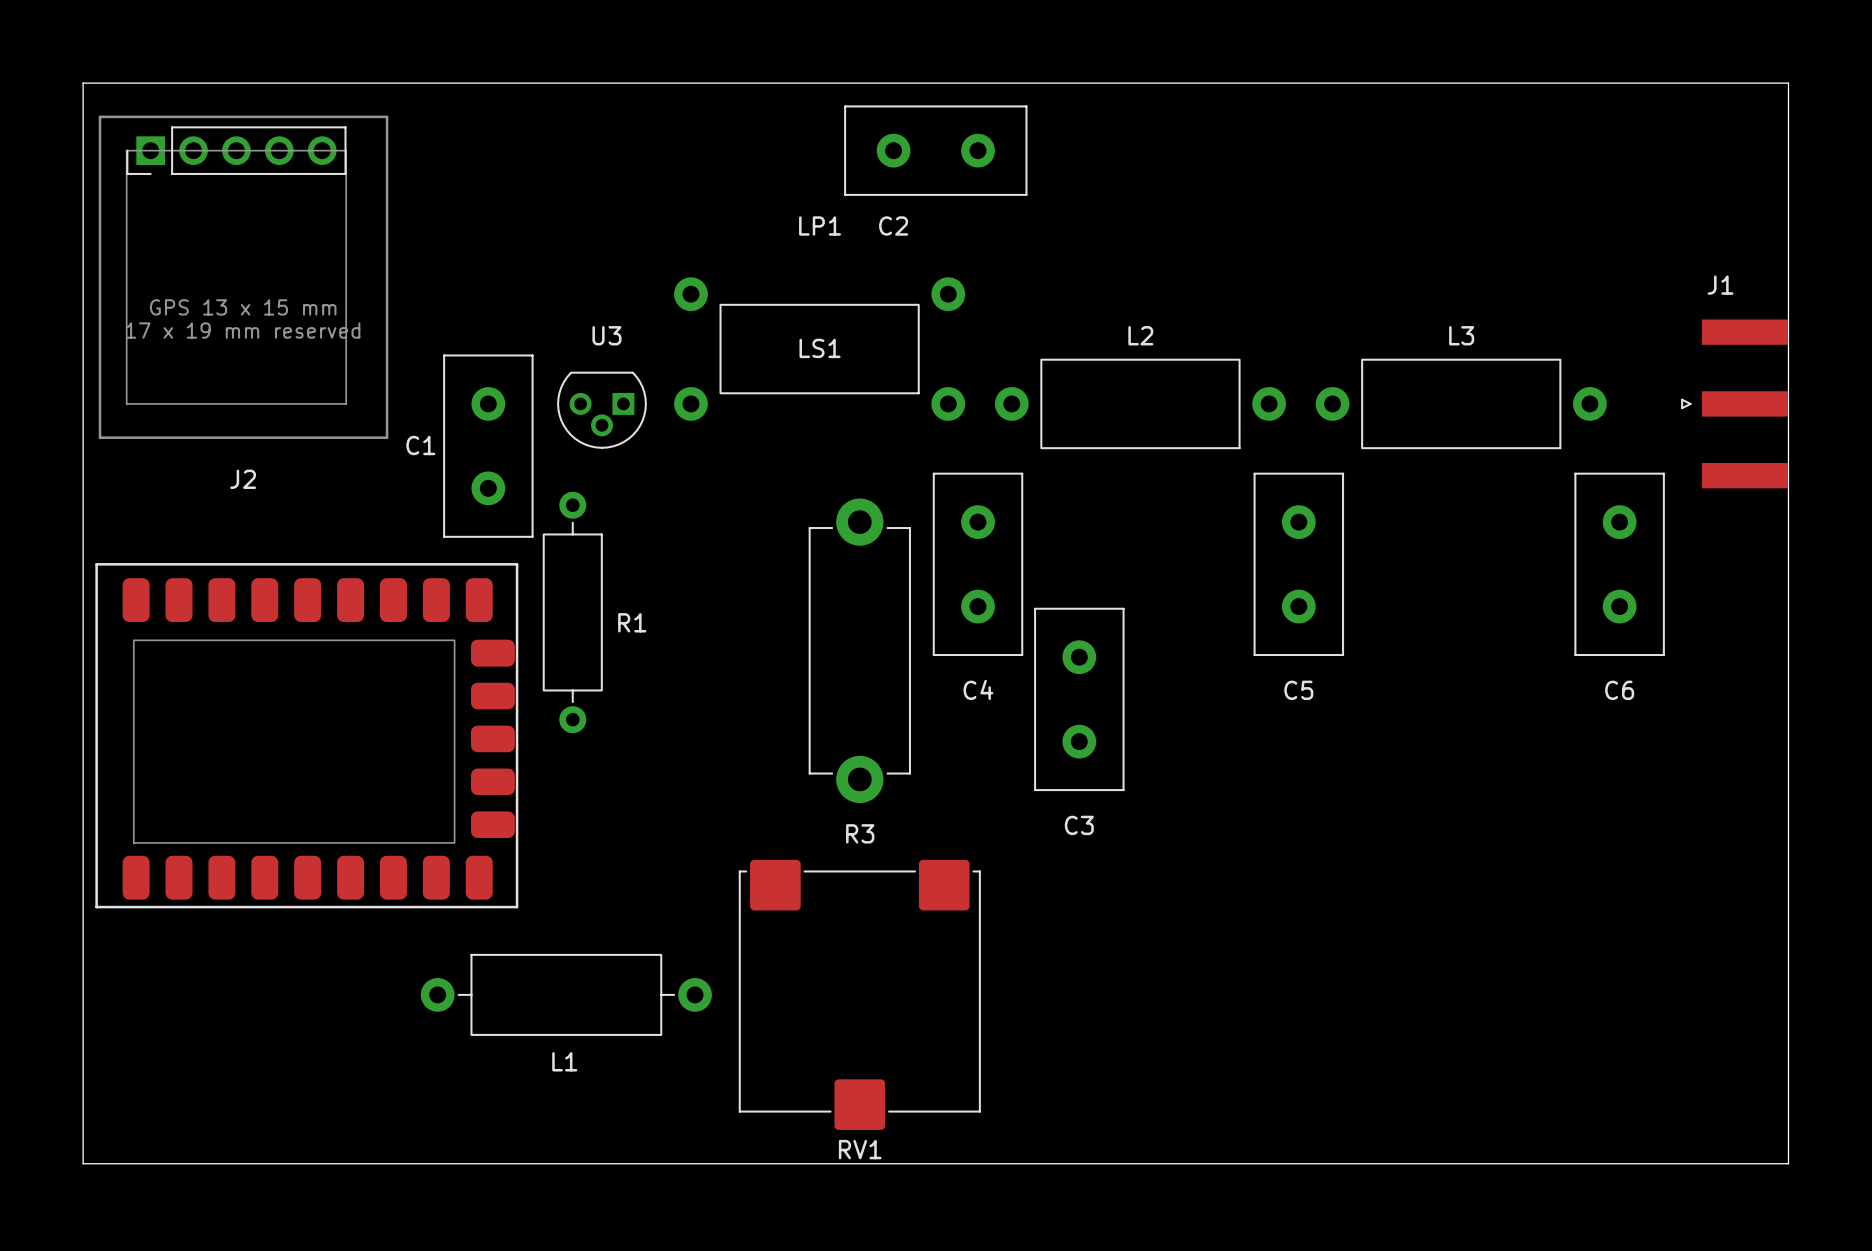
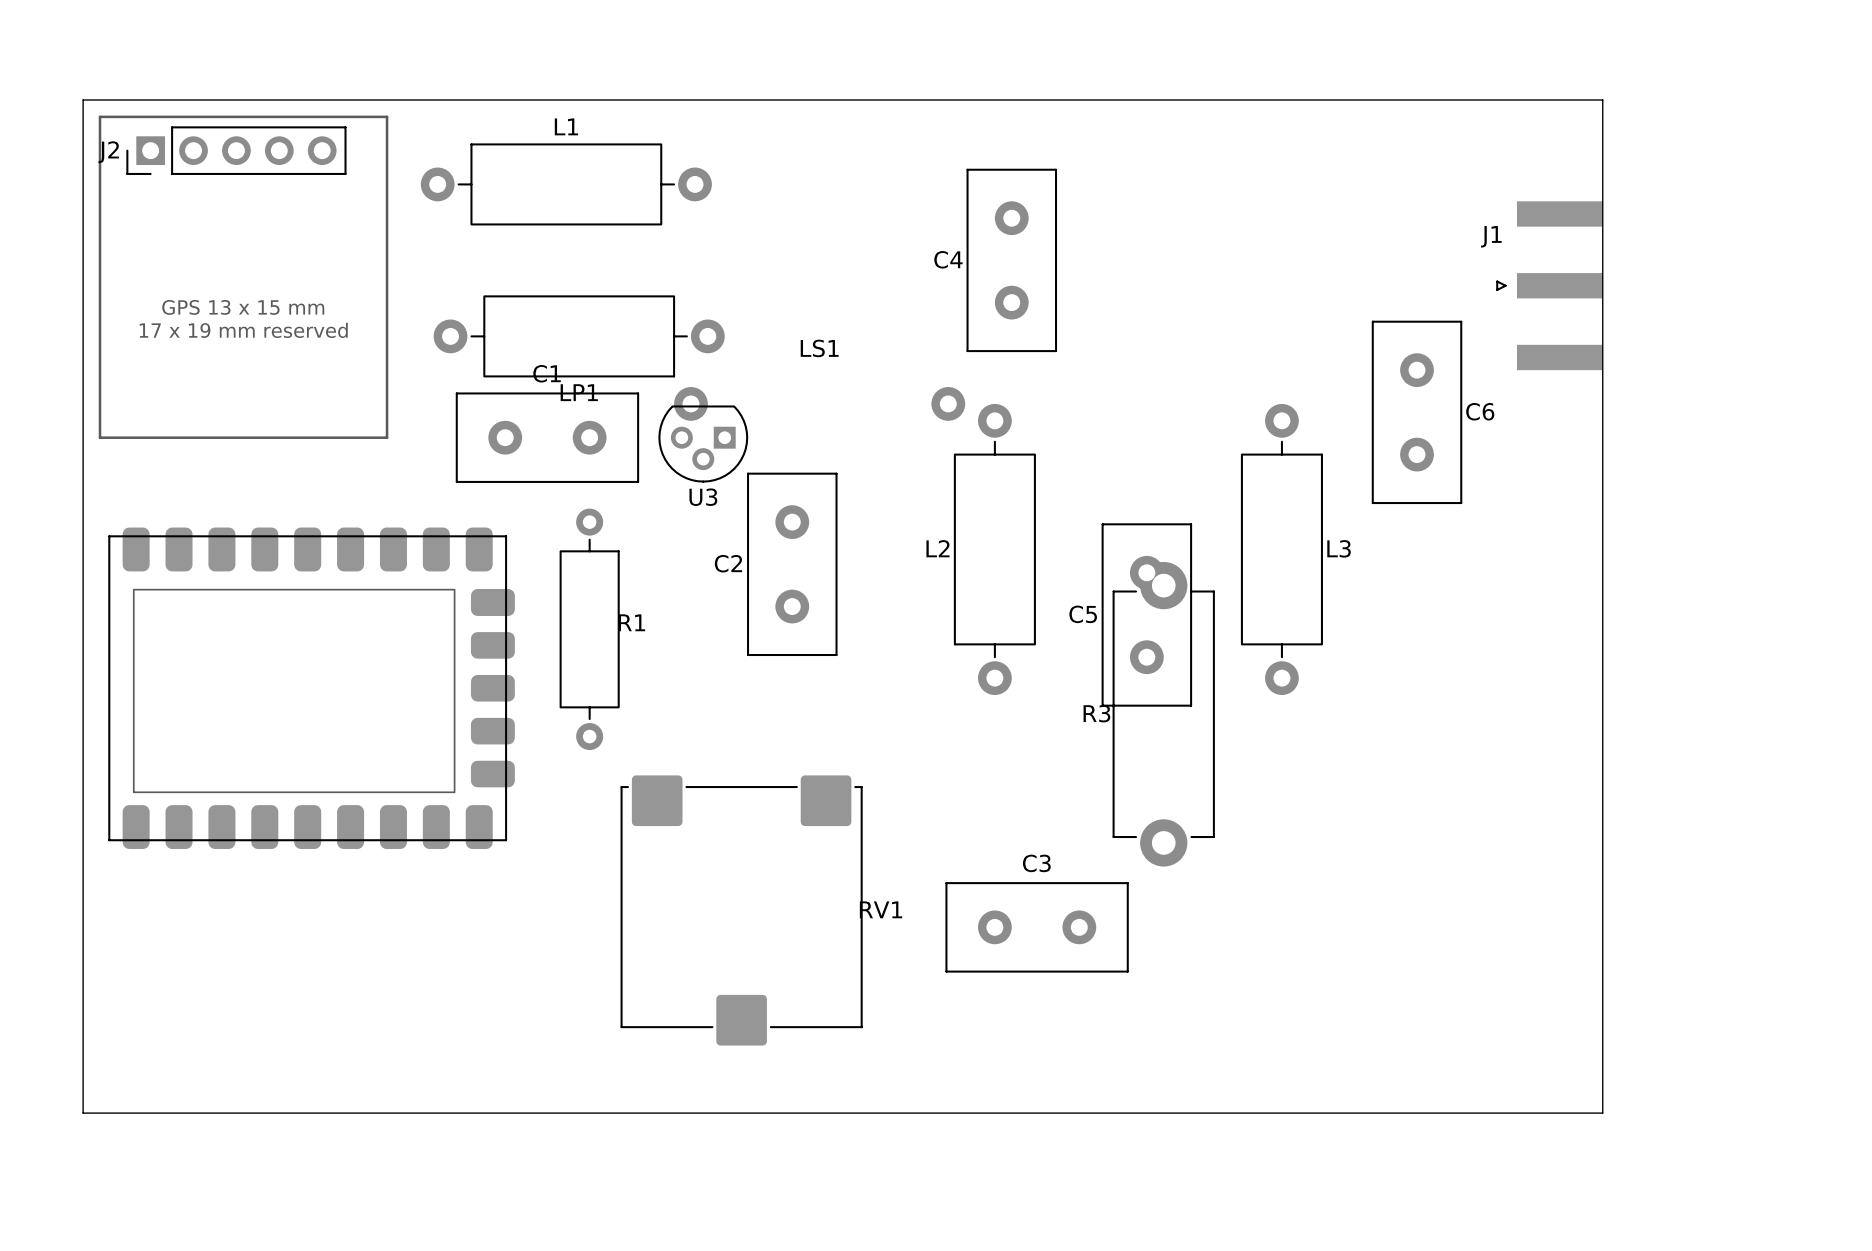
board edge: (83, 100) (83, 83) (1788, 83) (1788, 1163) (83, 1163) (83, 1113) -> (83, 100) (1602, 100) (1602, 1113) (83, 1113)
line: (126, 150) (346, 150) (346, 403) (126, 403) (126, 150) -> none
C2 rotation: 0° (935, 150) -> 90° clockwise (792, 564)
C2 position: (935, 150) -> (792, 564)
LP1 name position: LP1 (820, 226) -> LP1 (579, 392)
C2 name position: C2 (893, 226) -> C2 (728, 563)
LP1 footprint: [674, 277, 966, 395] -> [433, 295, 725, 378]
J1 name position: J1 (1720, 285) -> J1 (1491, 236)
U3 name position: U3 (606, 335) -> U3 (703, 497)
L2 name position: L2 (1140, 335) -> L2 (937, 548)
L3 name position: L3 (1461, 335) -> L3 (1339, 548)
L2 footprint: [994, 358, 1286, 450] -> [953, 403, 1036, 696]
L3 footprint: [1315, 358, 1607, 450] -> [1240, 403, 1323, 696]
J1 position: (1734, 403) -> (1549, 285)
U3 position: (601, 410) -> (703, 444)
C1 rotation: 0° (488, 446) -> 90° clockwise (547, 437)
J2 name position: J2 (243, 479) -> J2 (108, 152)
line: (96, 564) (517, 564) (517, 907) (96, 907) (96, 564) -> none
C4 position: (978, 564) -> (1011, 260)
C5 position: (1298, 564) -> (1146, 614)
C6 position: (1619, 564) -> (1417, 412)
R1 position: (572, 612) -> (589, 629)
R3 position: (859, 650) -> (1163, 714)
part: none -> (311, 688)
C4 name position: C4 (978, 689) -> C4 (948, 259)
C5 name position: C5 (1298, 690) -> C5 (1083, 614)
C6 name position: C6 (1619, 690) -> C6 (1480, 411)
C3 rotation: 0° (1079, 699) -> 90° clockwise (1037, 927)
C3 position: (1079, 699) -> (1037, 927)
part: (318, 738) -> none
C3 name position: C3 (1079, 825) -> C3 (1036, 863)
R3 name position: R3 (860, 833) -> R3 (1096, 713)
L1 position: (566, 994) -> (566, 184)
RV1 position: (859, 994) -> (741, 910)
L1 name position: L1 (564, 1061) -> L1 (566, 126)
RV1 name position: RV1 (860, 1149) -> RV1 (880, 909)

